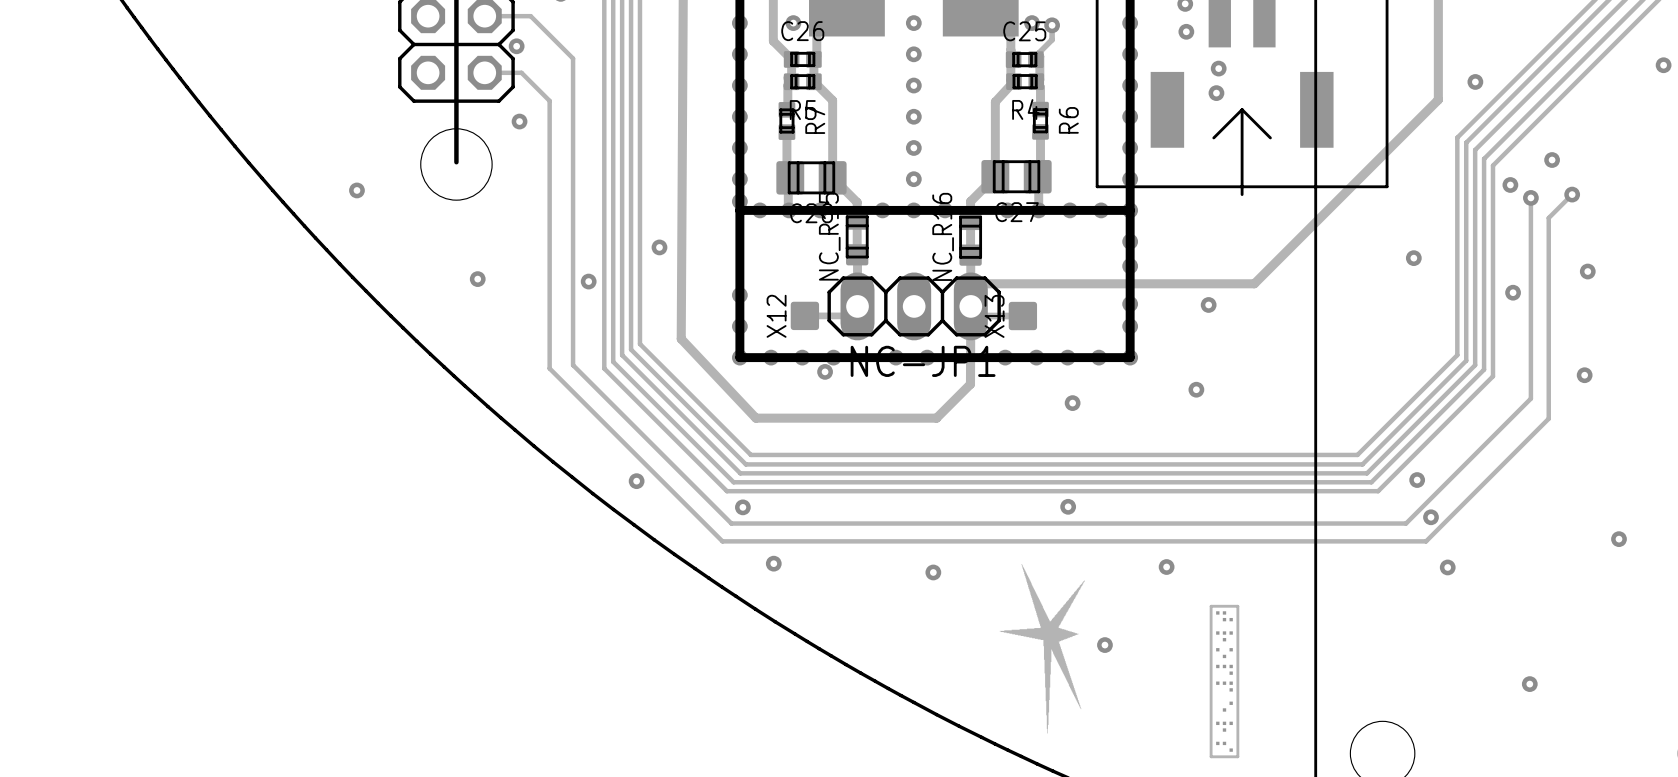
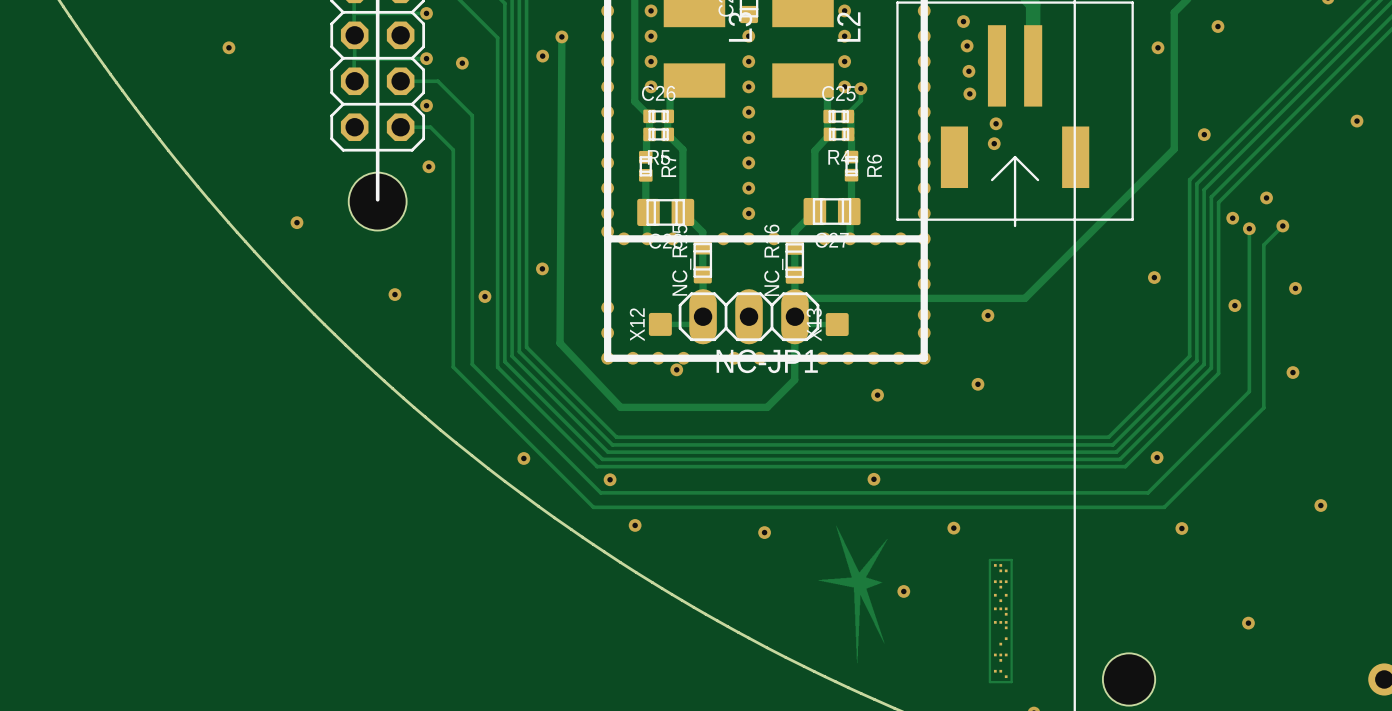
via: (1430, 517) -> none

